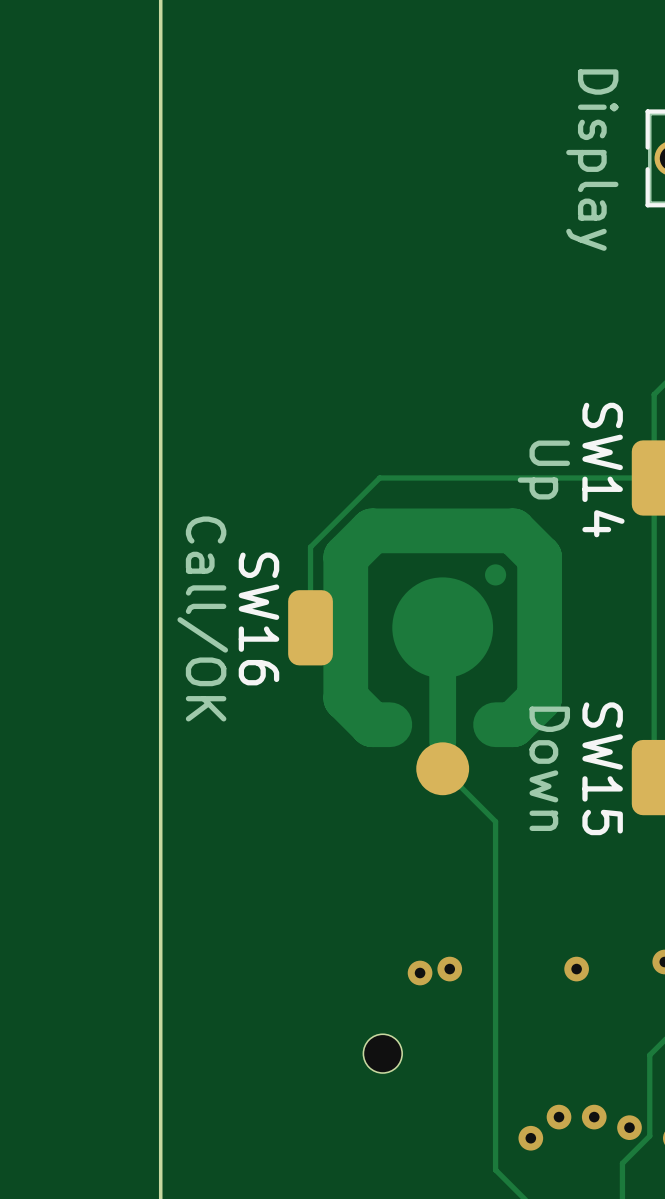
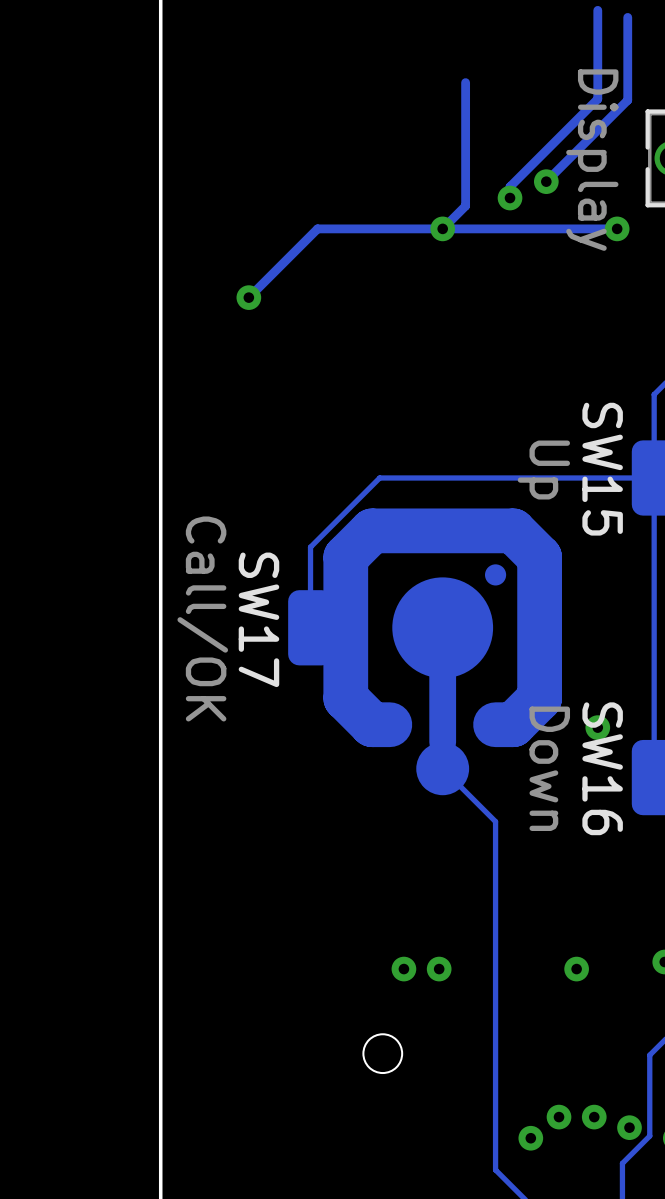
track: none -> (597, 10) (597, 99) (510, 186) (510, 198)
track: none -> (627, 17) (627, 100) (546, 181)
track: none -> (465, 82) (465, 205) (442, 228)
via: none -> (546, 181)
via: none -> (510, 198)
via: none -> (442, 228)
track: none -> (617, 228) (317, 228) (248, 297)
via: none -> (617, 228)
via: none -> (248, 297)
SW14 name: SW14 (603, 470) -> SW15 (602, 469)
SW16 name: SW16 (258, 618) -> SW17 (258, 619)
via: none -> (597, 727)
SW15 name: SW15 (602, 768) -> SW16 (602, 768)
via: none -> (403, 969)
via: none -> (439, 969)
via: (449, 969) -> none
via: (420, 973) -> none

